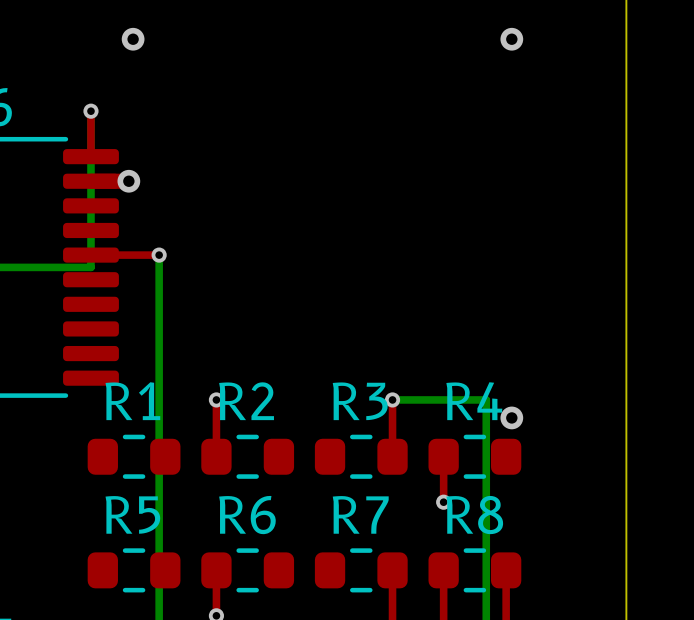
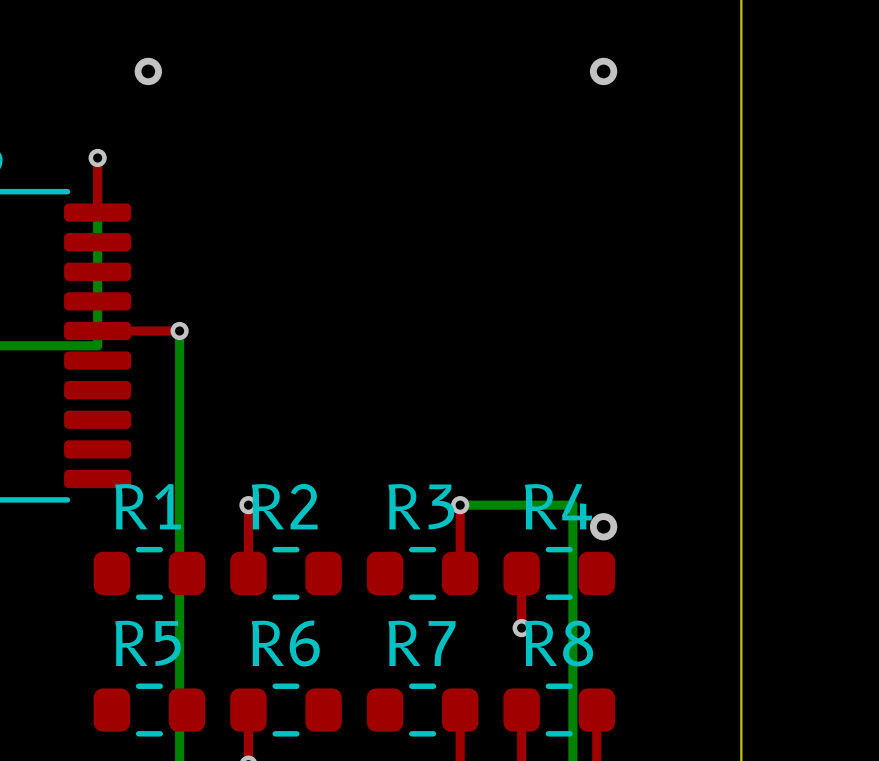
via: (128, 181) -> none

